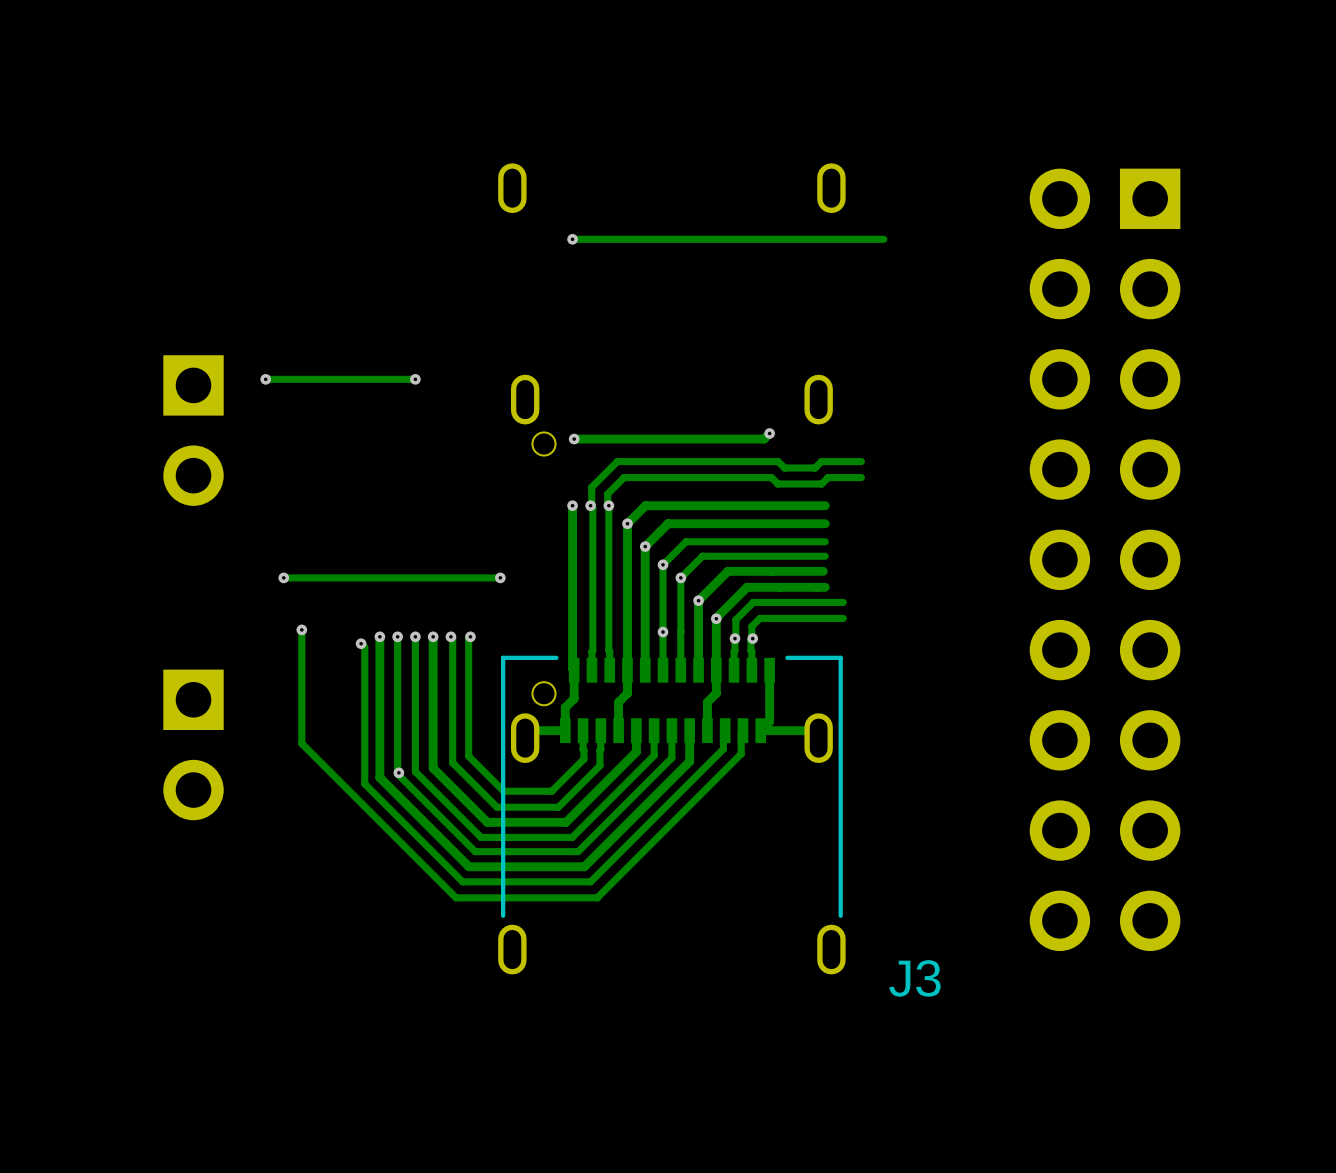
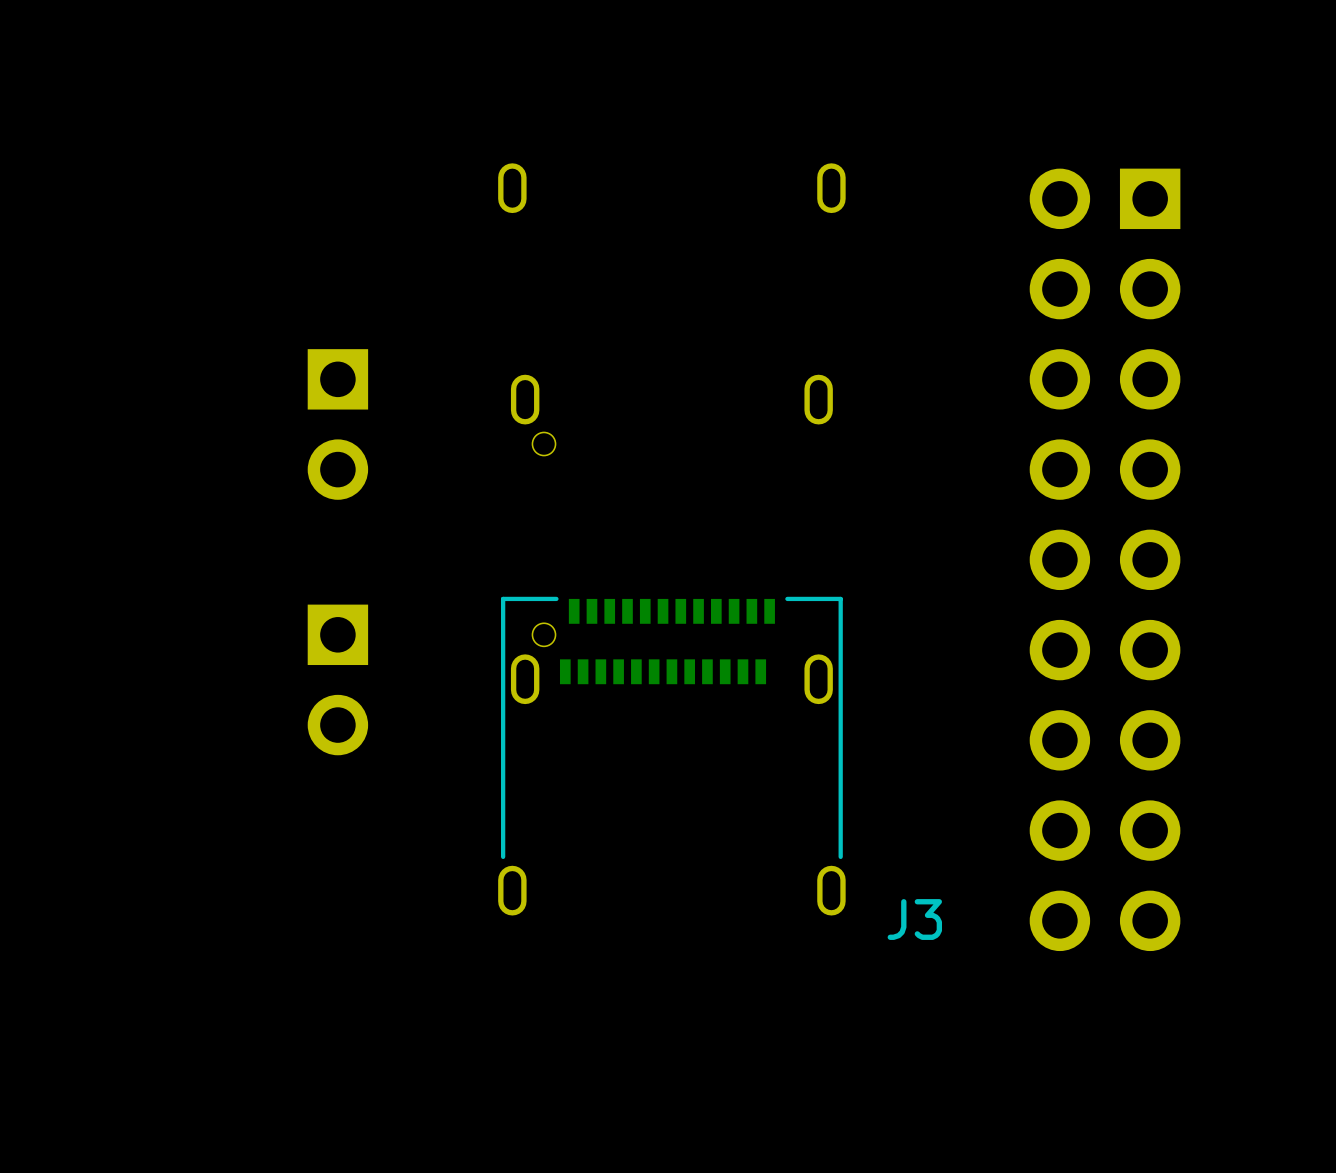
via: (572, 239) -> none
track: (883, 239) (572, 239) -> none
via: (265, 379) -> none
track: (415, 379) (265, 379) -> none
via: (415, 379) -> none
part: none -> (337, 424)
part: (193, 430) -> none
track: (769, 433) (764, 439) (574, 439) -> none
via: (769, 433) -> none
via: (574, 439) -> none
track: (861, 461) (821, 461) (815, 467) (784, 467) (778, 461) (617, 461) (591, 487) (591, 670) -> none
track: (861, 477) (828, 477) (821, 483) (777, 483) (771, 477) (624, 477) (607, 493) (609, 670) -> none
track: (572, 505) (574, 698) (565, 707) (565, 730) (532, 730) (525, 738) -> none
via: (572, 505) -> none
via: (590, 505) -> none
via: (608, 505) -> none
track: (825, 505) (645, 505) (627, 523) (627, 693) (618, 702) (618, 730) -> none
via: (627, 523) -> none
track: (825, 523) (668, 523) (645, 546) (645, 670) -> none
track: (825, 541) (686, 541) (663, 564) (663, 670) -> none
via: (645, 546) -> none
track: (825, 556) (702, 556) (680, 577) (680, 670) -> none
via: (663, 564) -> none
track: (823, 571) (727, 571) (698, 600) (698, 670) -> none
via: (283, 577) -> none
track: (500, 577) (283, 577) -> none
via: (500, 577) -> none
via: (680, 577) -> none
track: (825, 587) (747, 587) (716, 618) (716, 693) (707, 702) (707, 730) -> none
via: (698, 600) -> none
track: (843, 602) (753, 602) (735, 619) (734, 670) -> none
via: (716, 618) -> none
track: (843, 618) (759, 618) (751, 626) (751, 670) -> none
track: (301, 629) (301, 743) (456, 897) (597, 897) (741, 753) (741, 732) (742, 730) -> none
via: (301, 629) -> none
via: (663, 632) -> none
track: (379, 636) (379, 777) (468, 866) (584, 866) (689, 761) (689, 730) -> none
via: (379, 636) -> none
track: (397, 636) (397, 774) (475, 851) (578, 851) (671, 757) (671, 730) -> none
via: (397, 636) -> none
track: (415, 636) (415, 771) (481, 837) (572, 837) (654, 755) (654, 730) -> none
via: (415, 636) -> none
track: (433, 636) (433, 768) (487, 822) (566, 822) (636, 751) (636, 730) -> none
via: (433, 636) -> none
track: (450, 636) (452, 638) (452, 762) (497, 807) (558, 807) (599, 765) (600, 730) -> none
via: (450, 636) -> none
track: (470, 636) (468, 638) (468, 756) (503, 791) (551, 791) (583, 759) (583, 730) -> none
via: (470, 636) -> none
via: (734, 638) -> none
via: (752, 638) -> none
track: (361, 643) (364, 647) (364, 783) (462, 881) (590, 881) (723, 749) (723, 730) (725, 730) -> none
via: (361, 643) -> none
track: (769, 670) (769, 721) (760, 730) (811, 730) (818, 738) -> none
part: none -> (337, 679)
part: (193, 744) -> none
via: (398, 772) -> none
J3 position: (671, 815) -> (671, 756)

